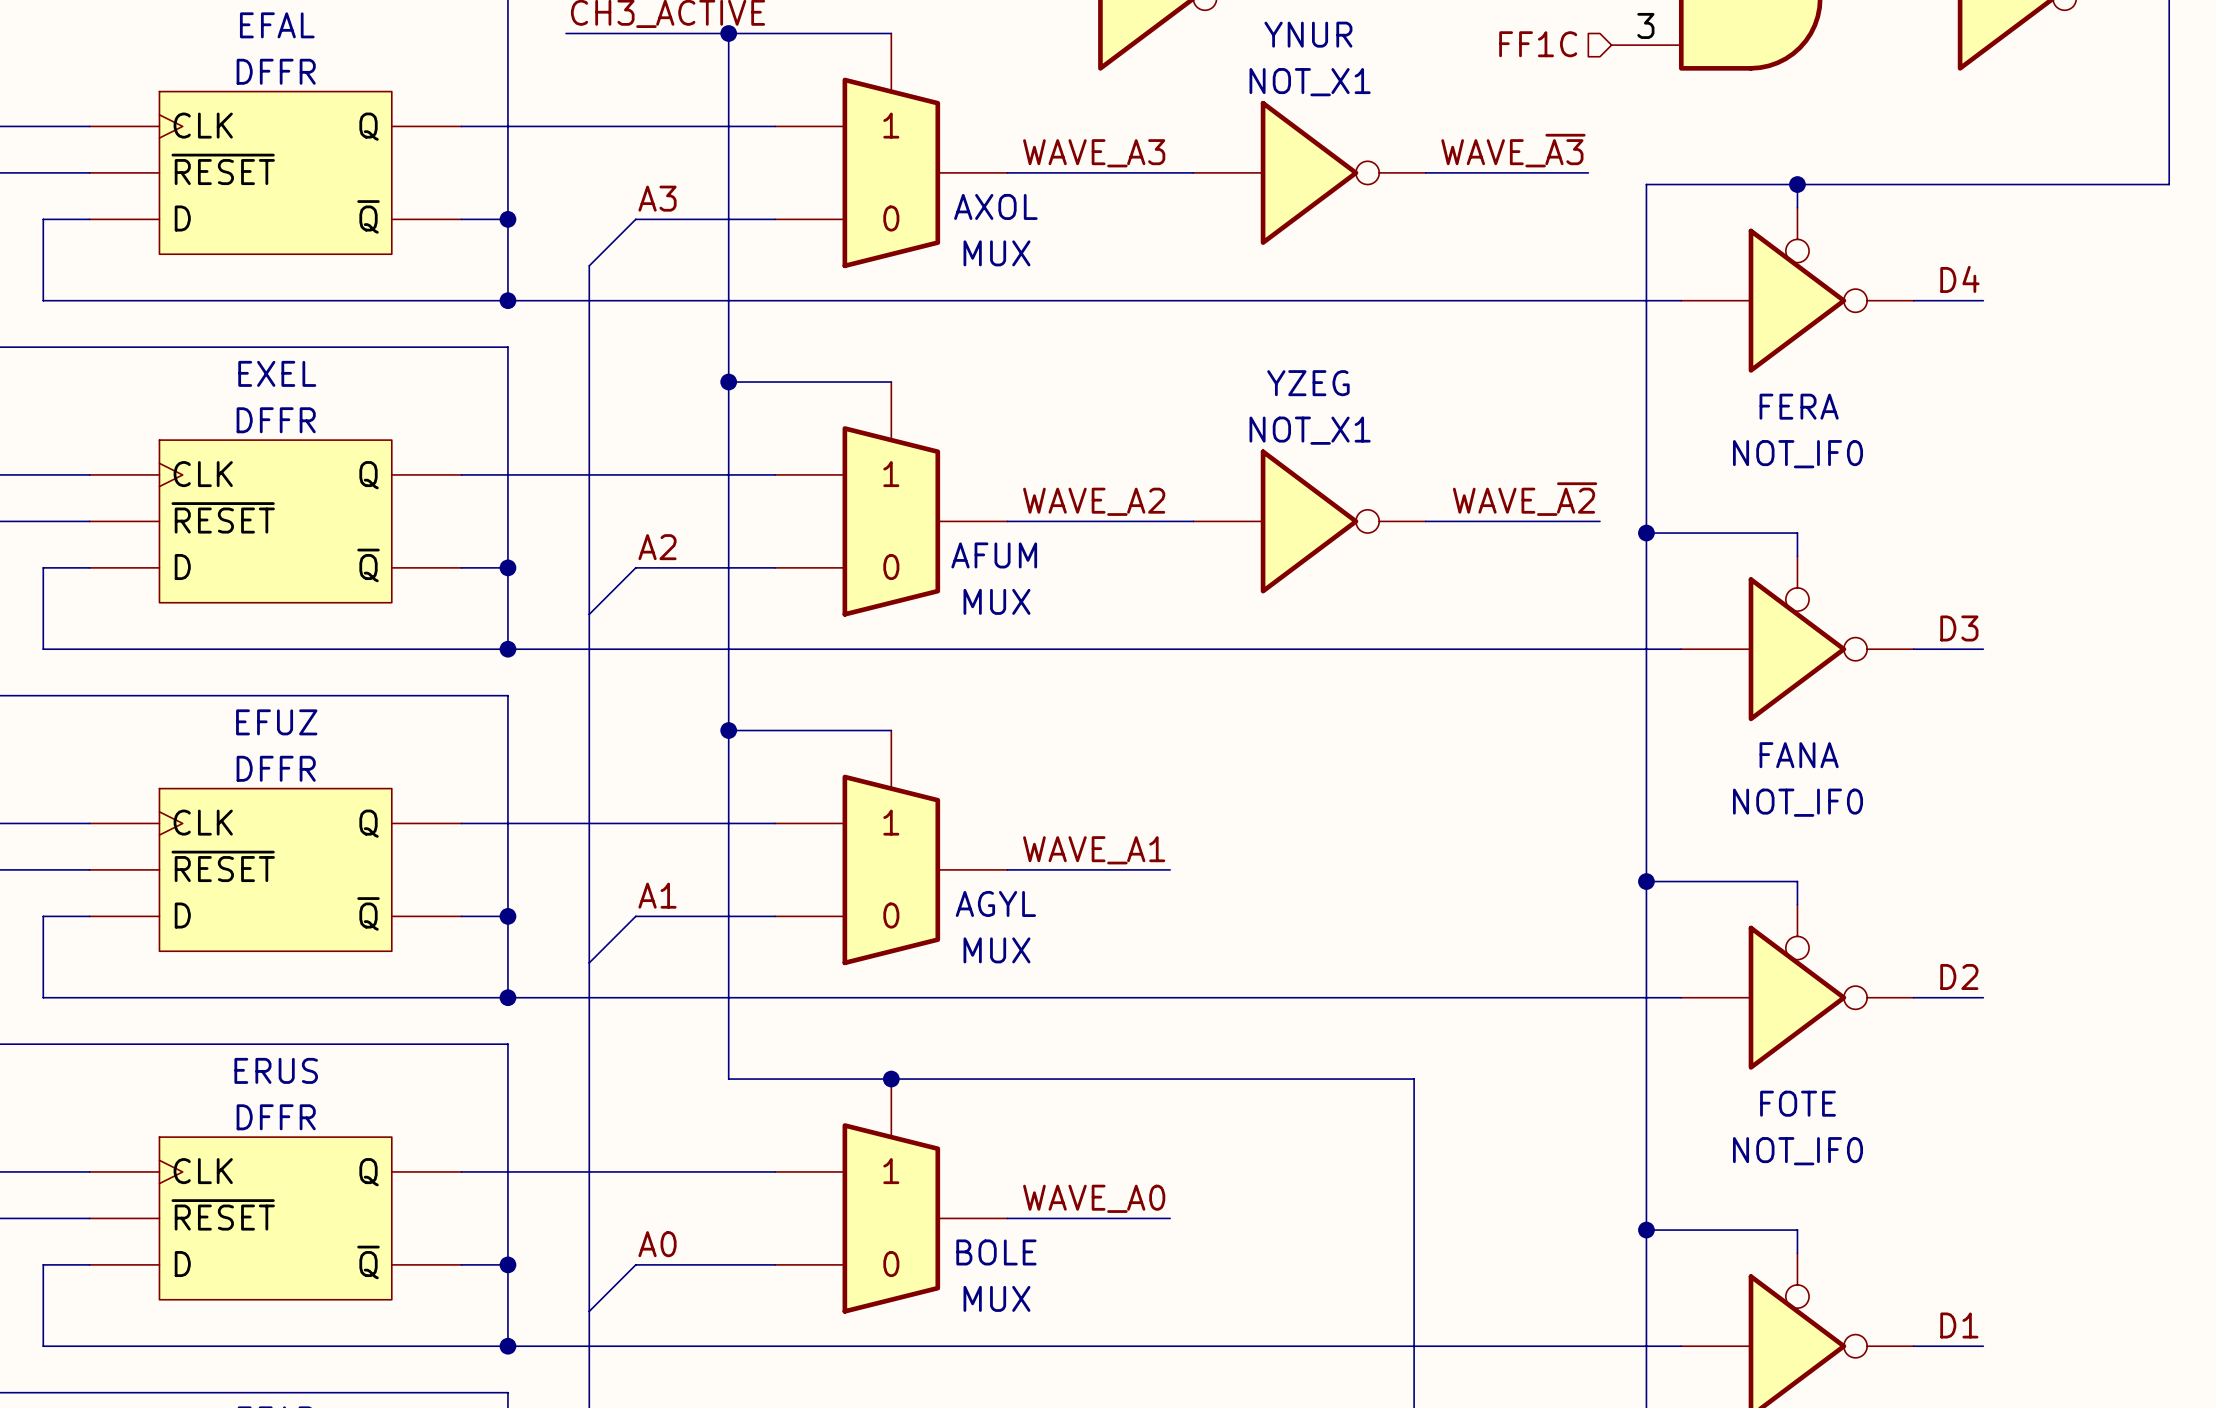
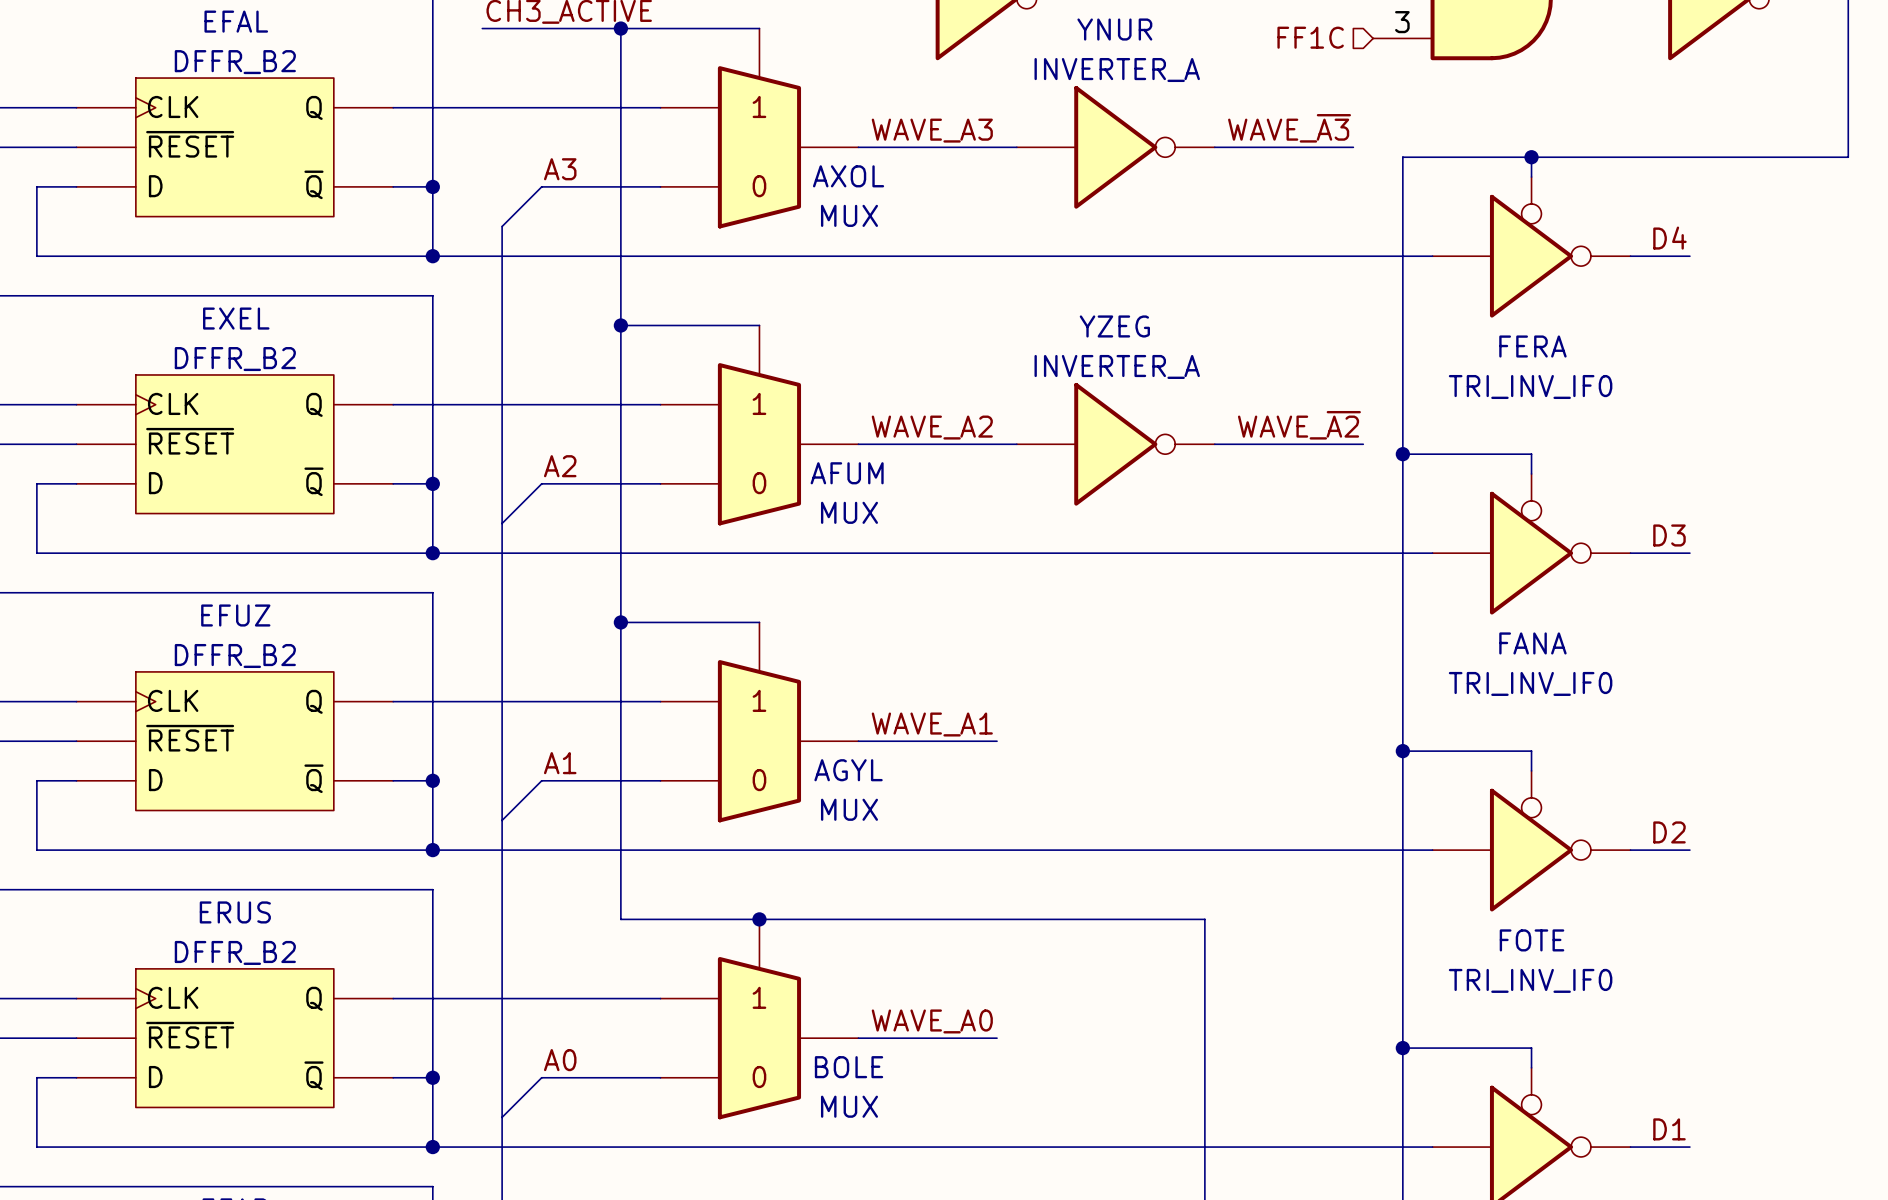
EFAL value: DFFR (276, 71) -> DFFR_B2 (235, 62)
YNUR value: NOT_X1 (1310, 82) -> INVERTER_A (1117, 70)
EXEL value: DFFR (276, 420) -> DFFR_B2 (235, 359)
YZEG value: NOT_X1 (1310, 430) -> INVERTER_A (1117, 366)
FERA value: NOT_IF0 (1798, 454) -> TRI_INV_IF0 (1530, 386)
EFUZ value: DFFR (276, 768) -> DFFR_B2 (235, 655)
FANA value: NOT_IF0 (1798, 802) -> TRI_INV_IF0 (1530, 683)
ERUS value: DFFR (276, 1117) -> DFFR_B2 (235, 952)
FOTE value: NOT_IF0 (1798, 1151) -> TRI_INV_IF0 (1530, 980)

